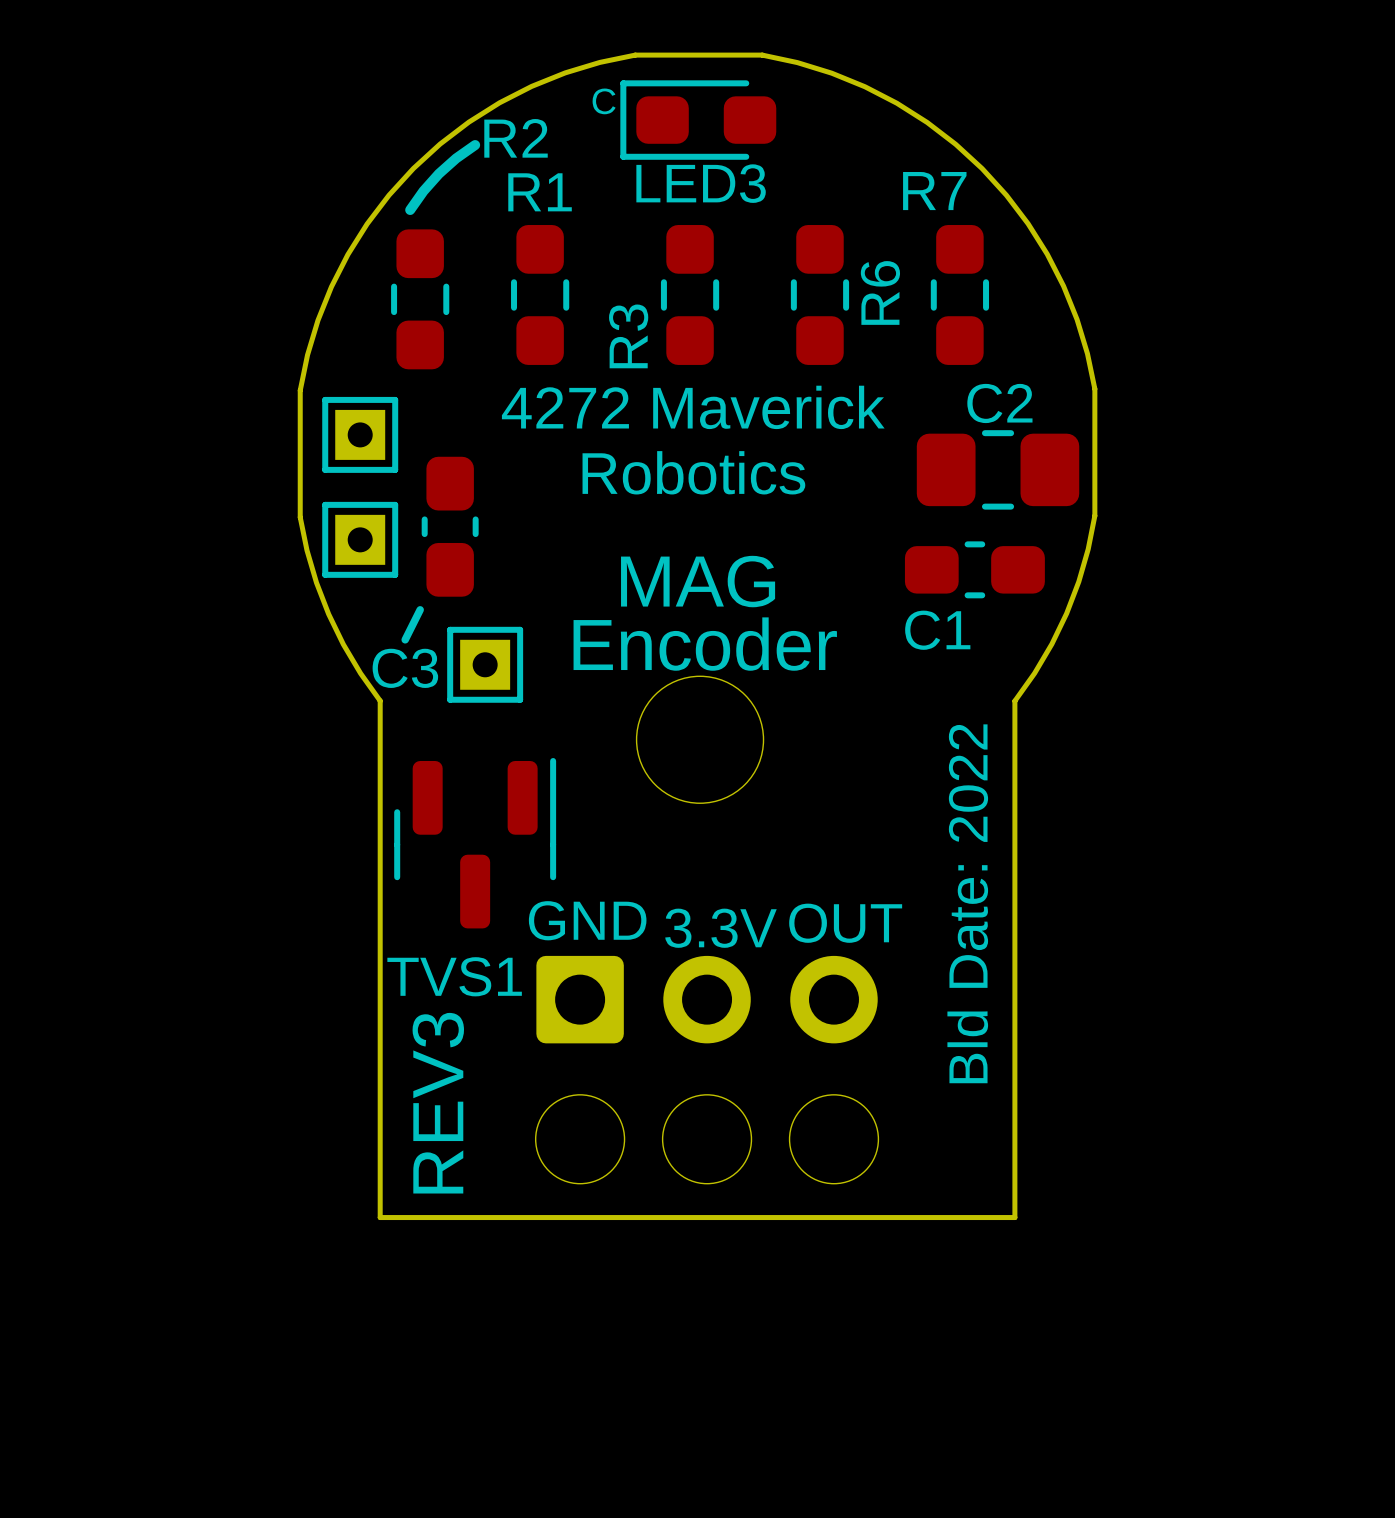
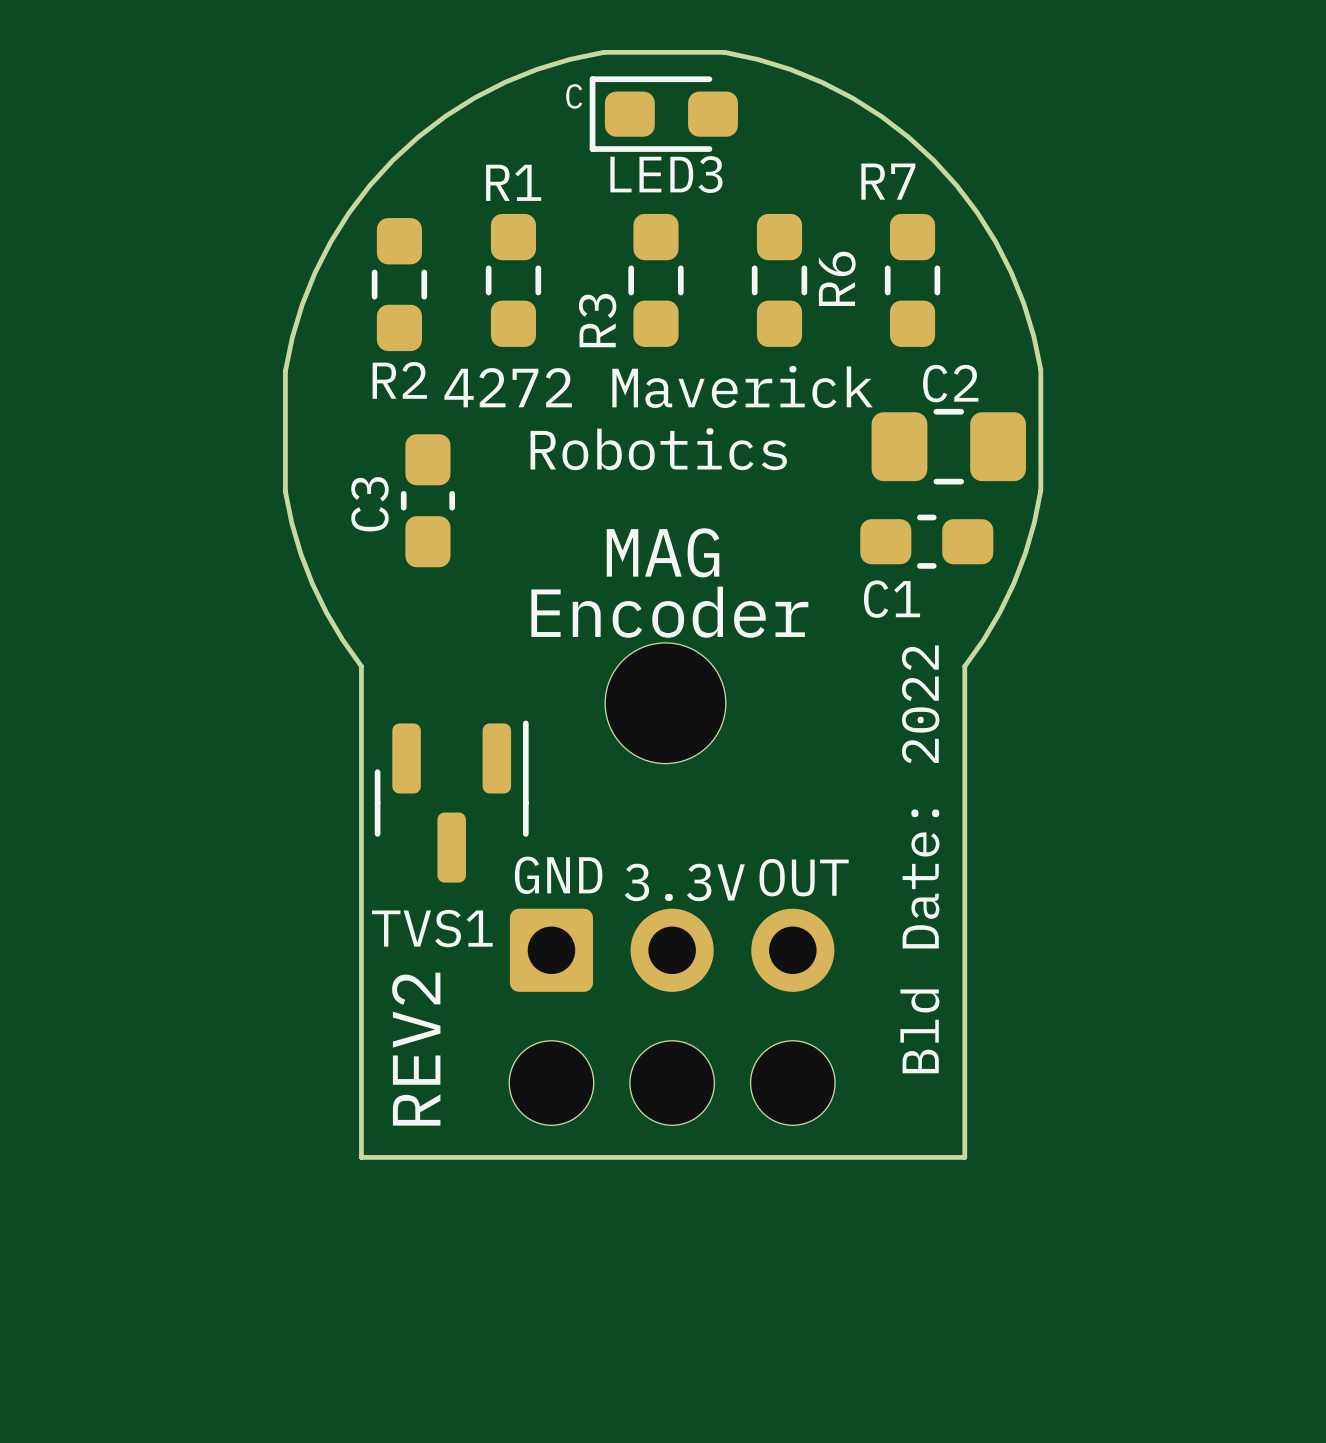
R2 name position: R2 (516, 138) -> R2 (399, 380)
line: (475, 145) (438, 173) (410, 210) -> none
part: (360, 434) -> none
part: (360, 539) -> none
line: (420, 609) (405, 639) -> none
part: (485, 664) -> none
C3 name rotation: 0° (405, 668) -> 90° counterclockwise (369, 504)
C3 name position: C3 (405, 668) -> C3 (369, 504)
text: REV3 (438, 1103) -> REV2 (416, 1049)

